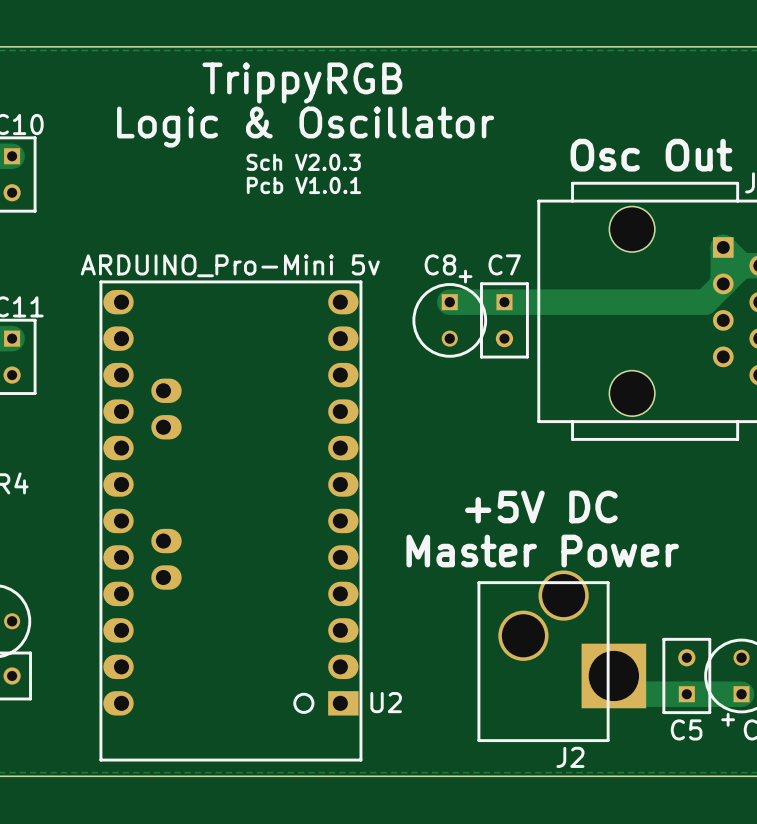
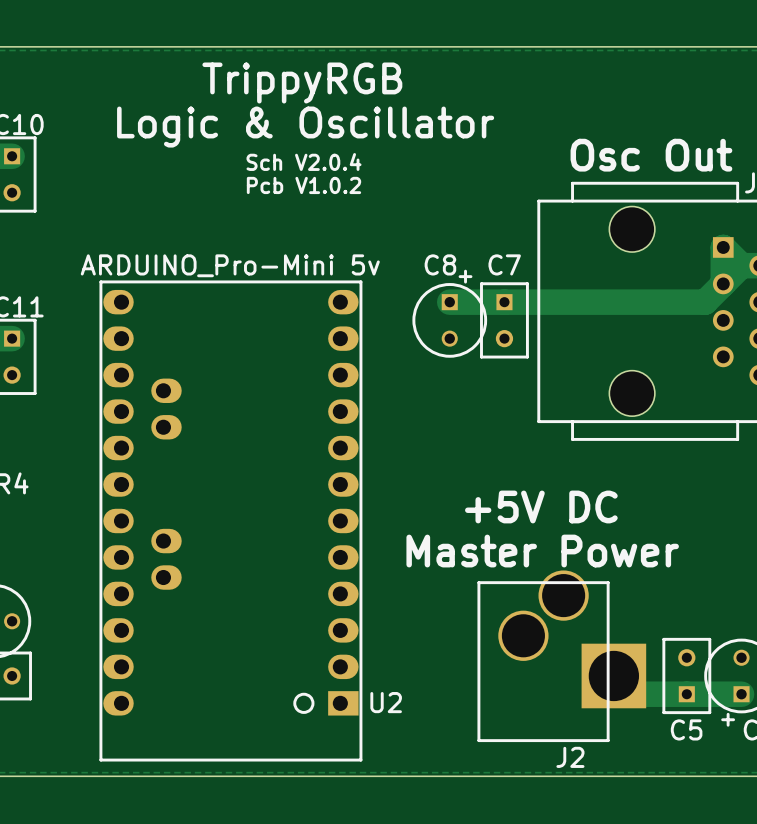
text: Sch V2.0.3 (303, 162) -> Sch V2.0.4 (303, 161)
text: Pcb V1.0.1 (303, 185) -> Pcb V1.0.2 (303, 185)

